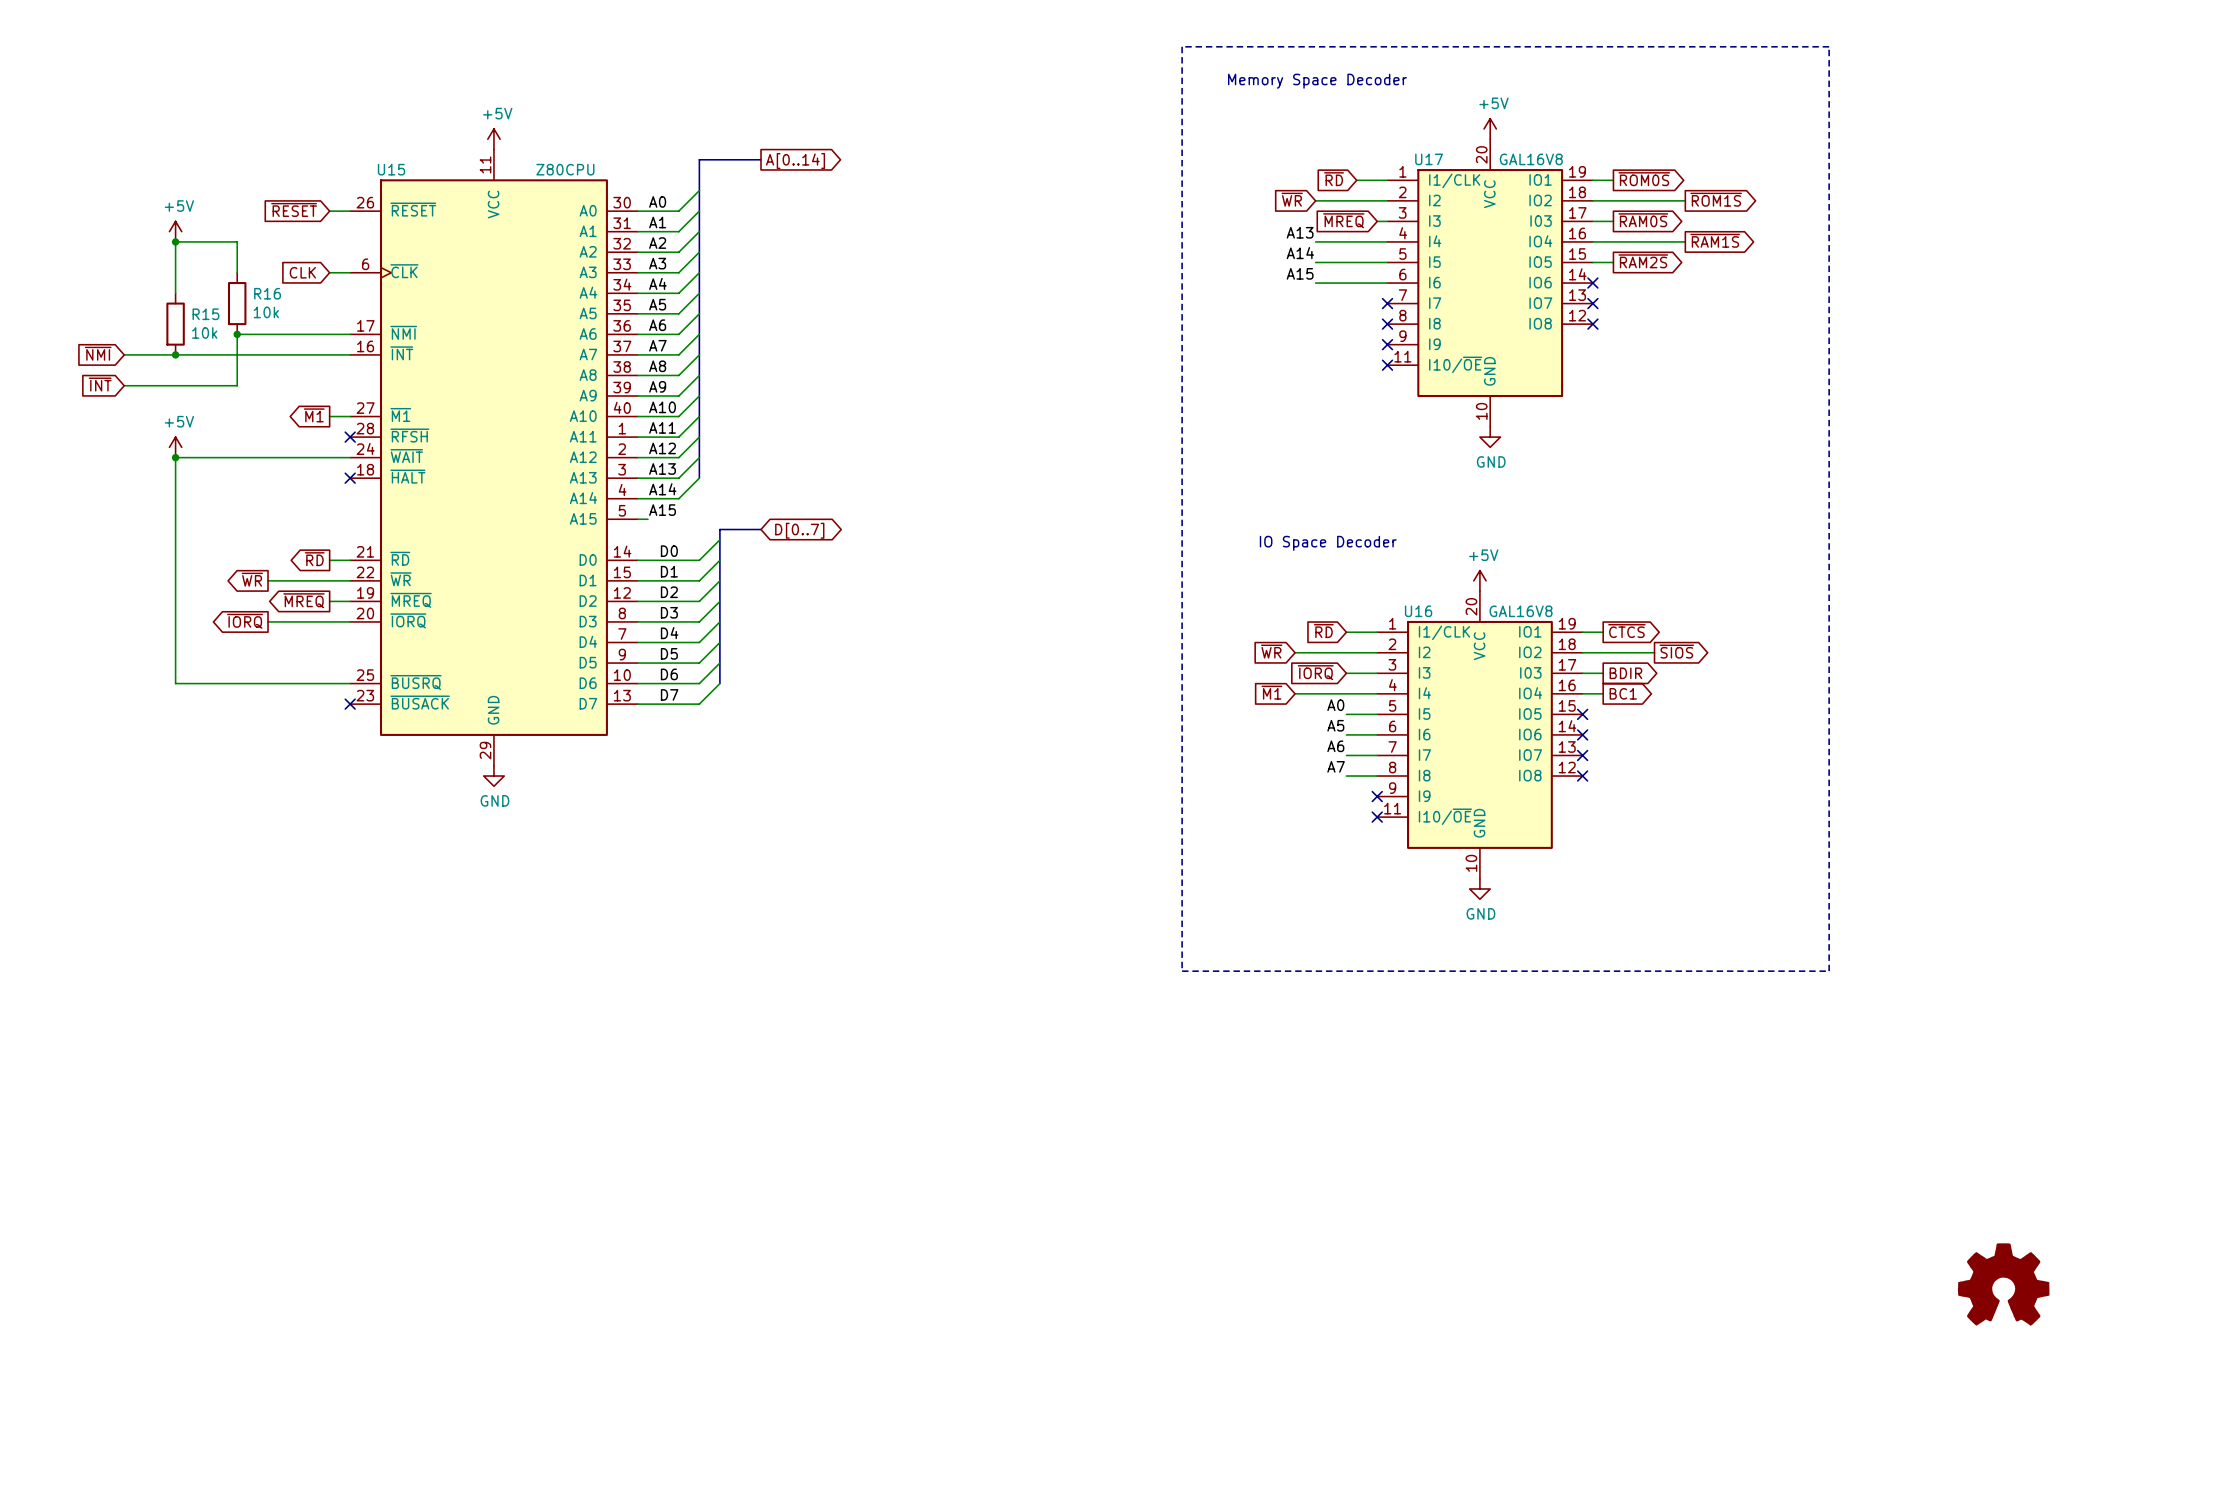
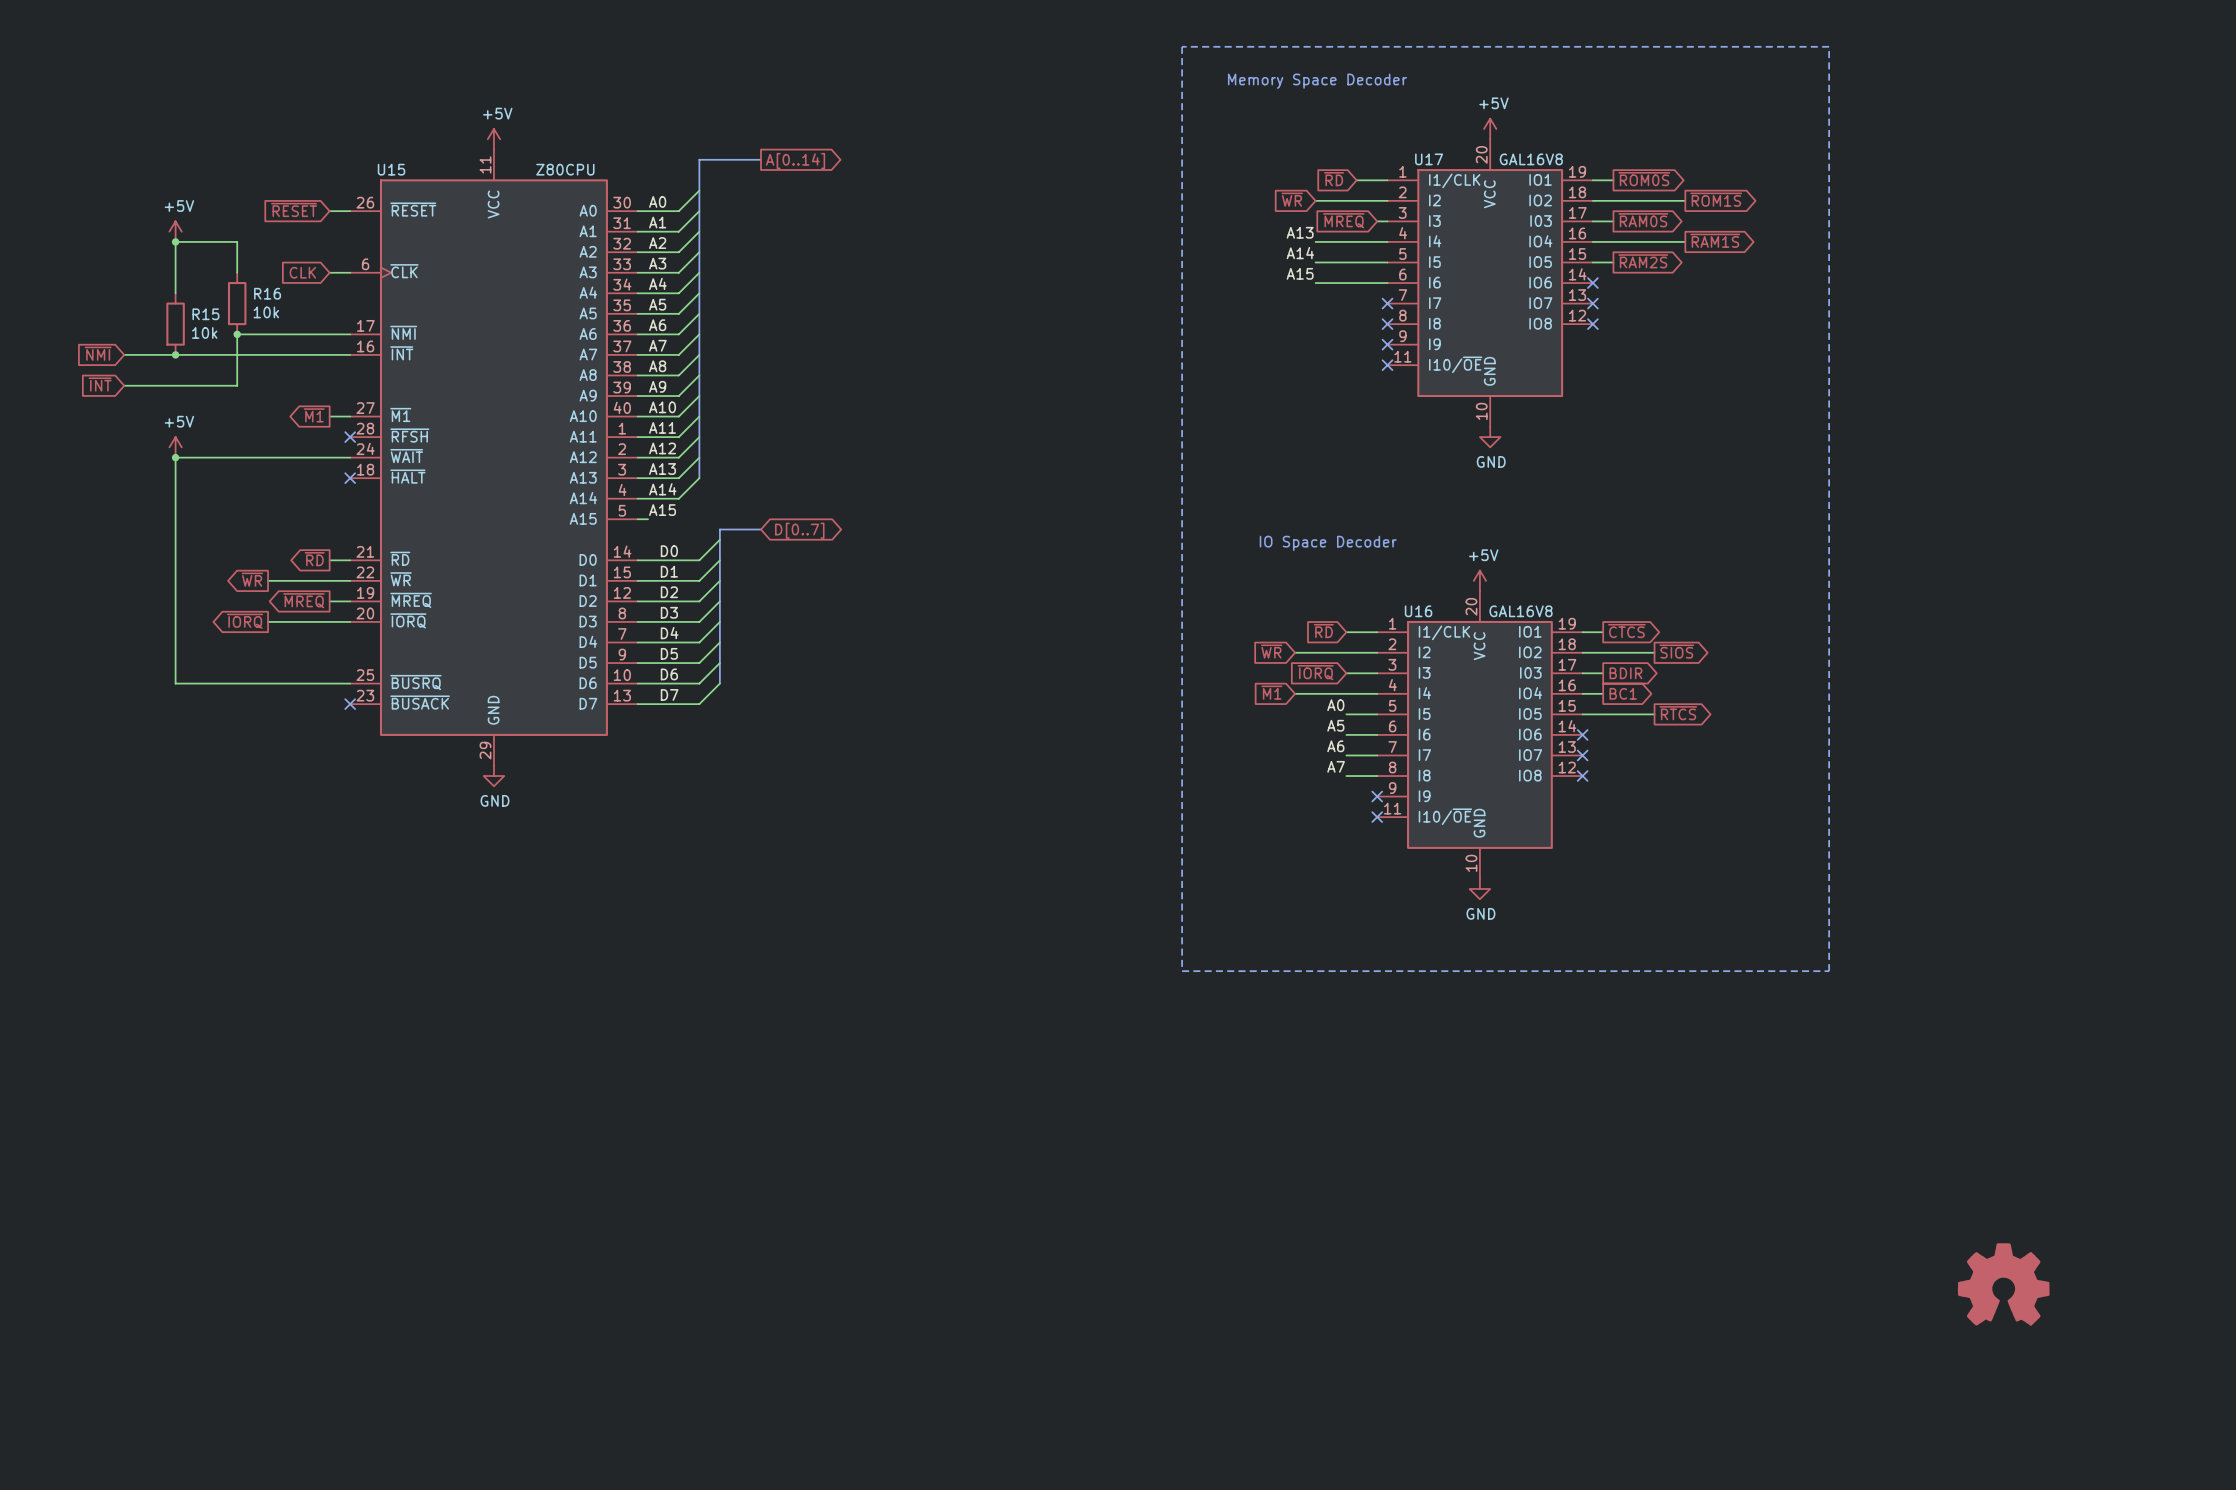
global label: none -> ~{RTCS} (1678, 713)
wire: none -> (1582, 714) (1654, 714)
no-connect mark: (1582, 714) -> none

